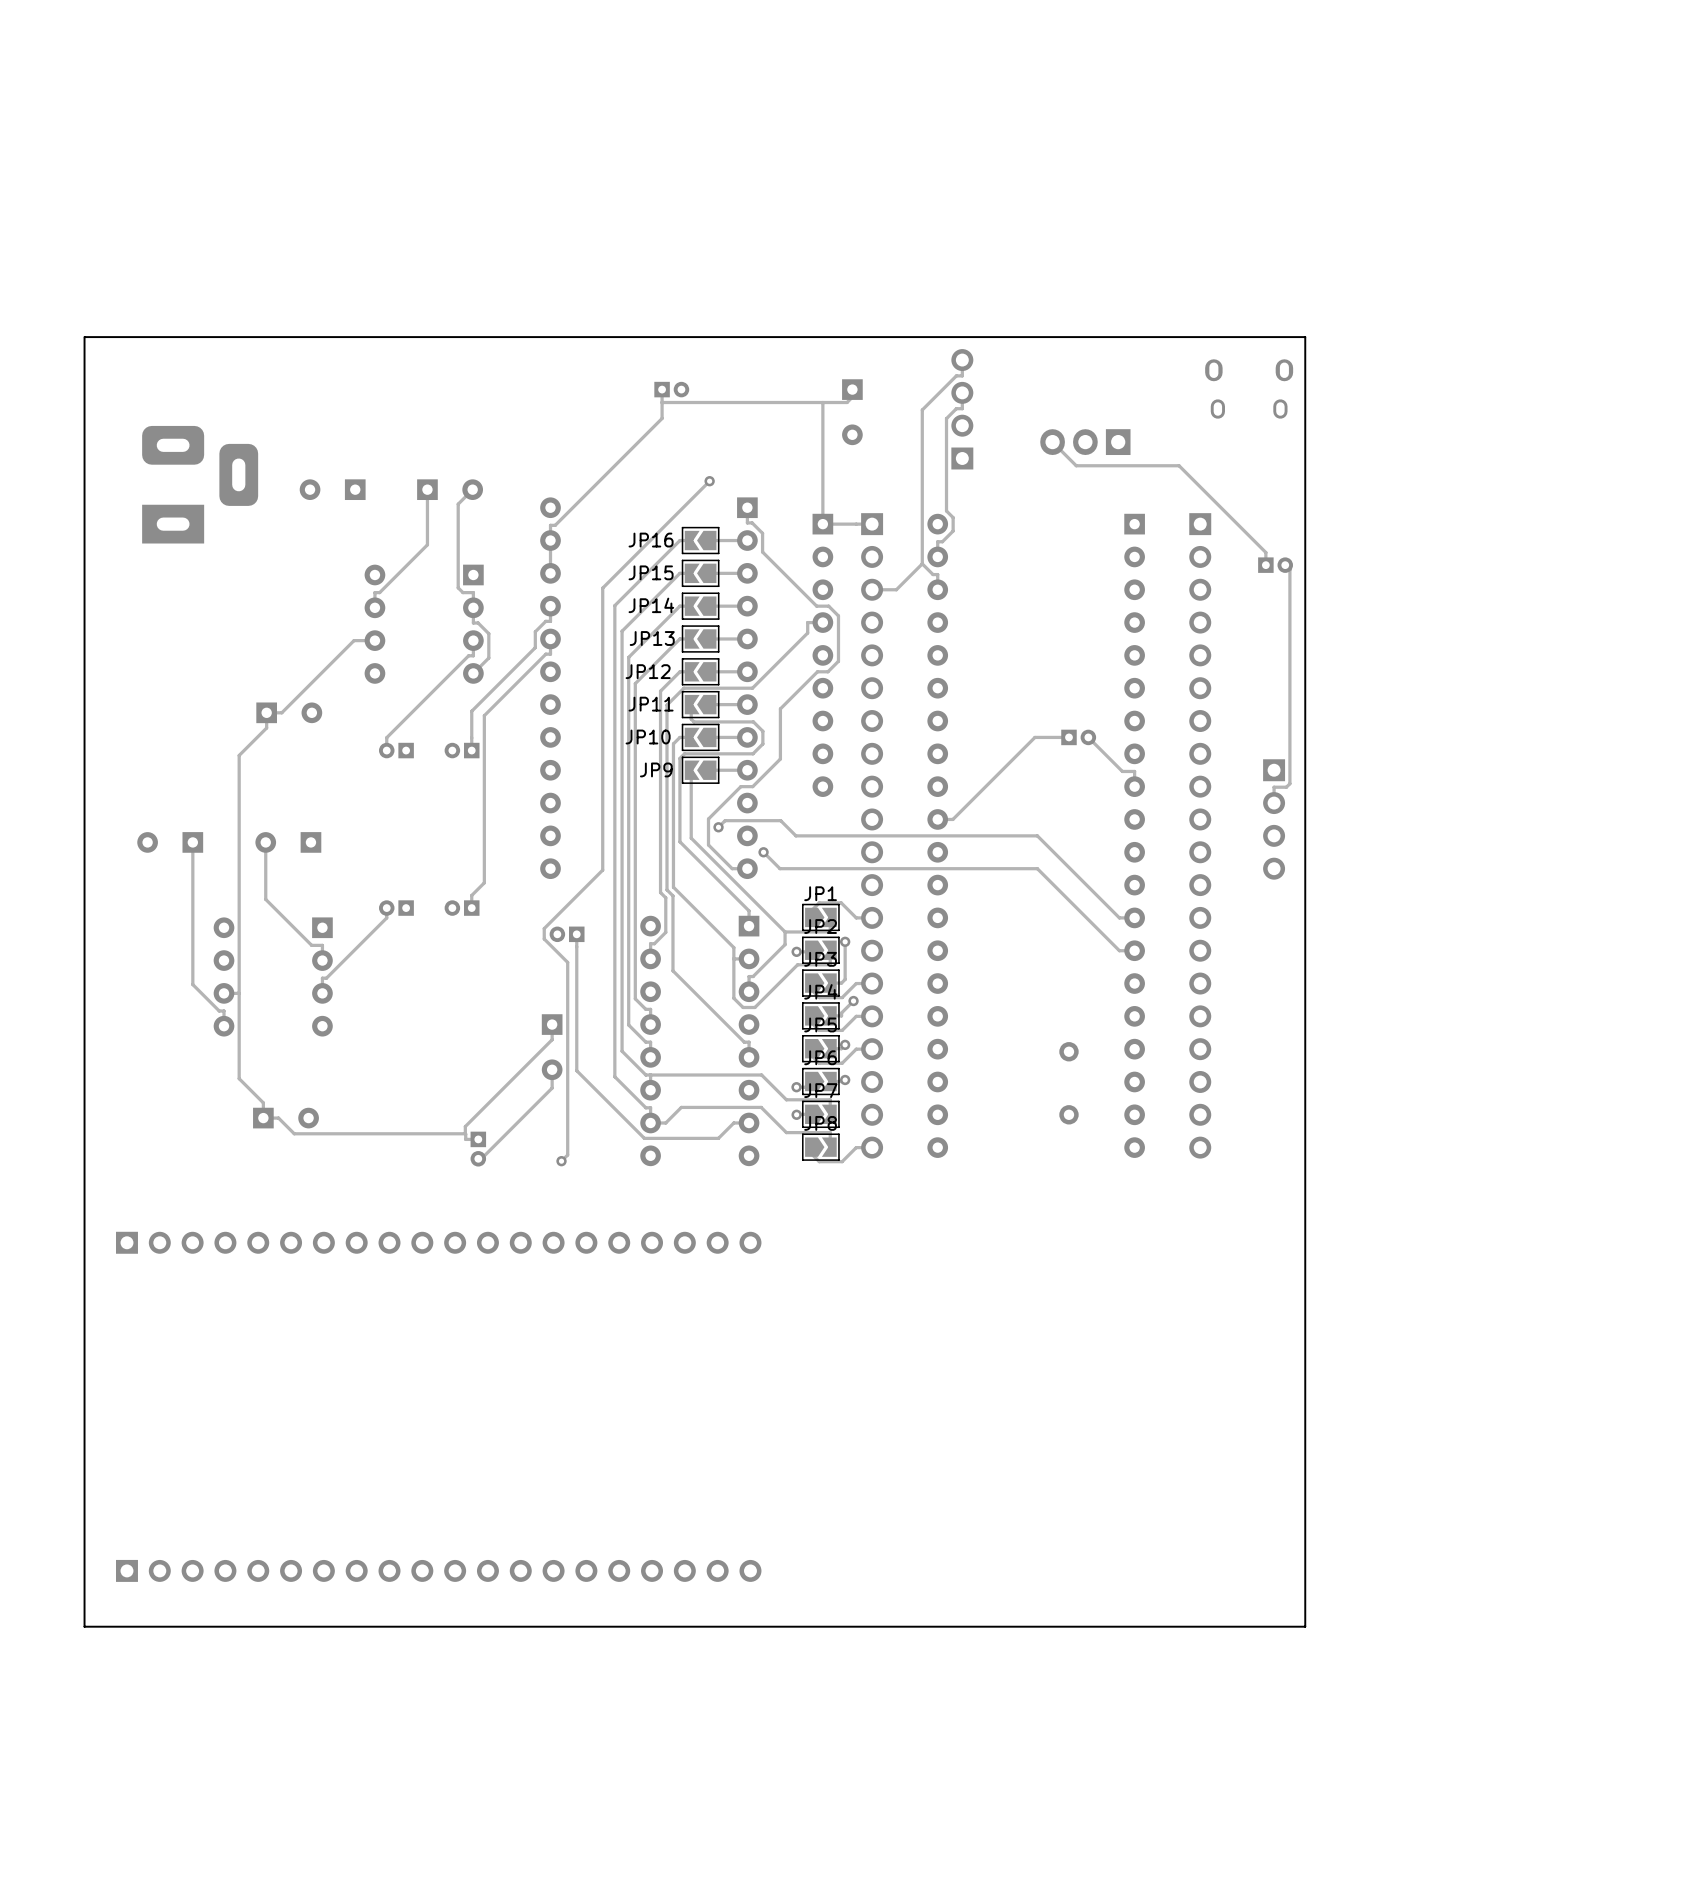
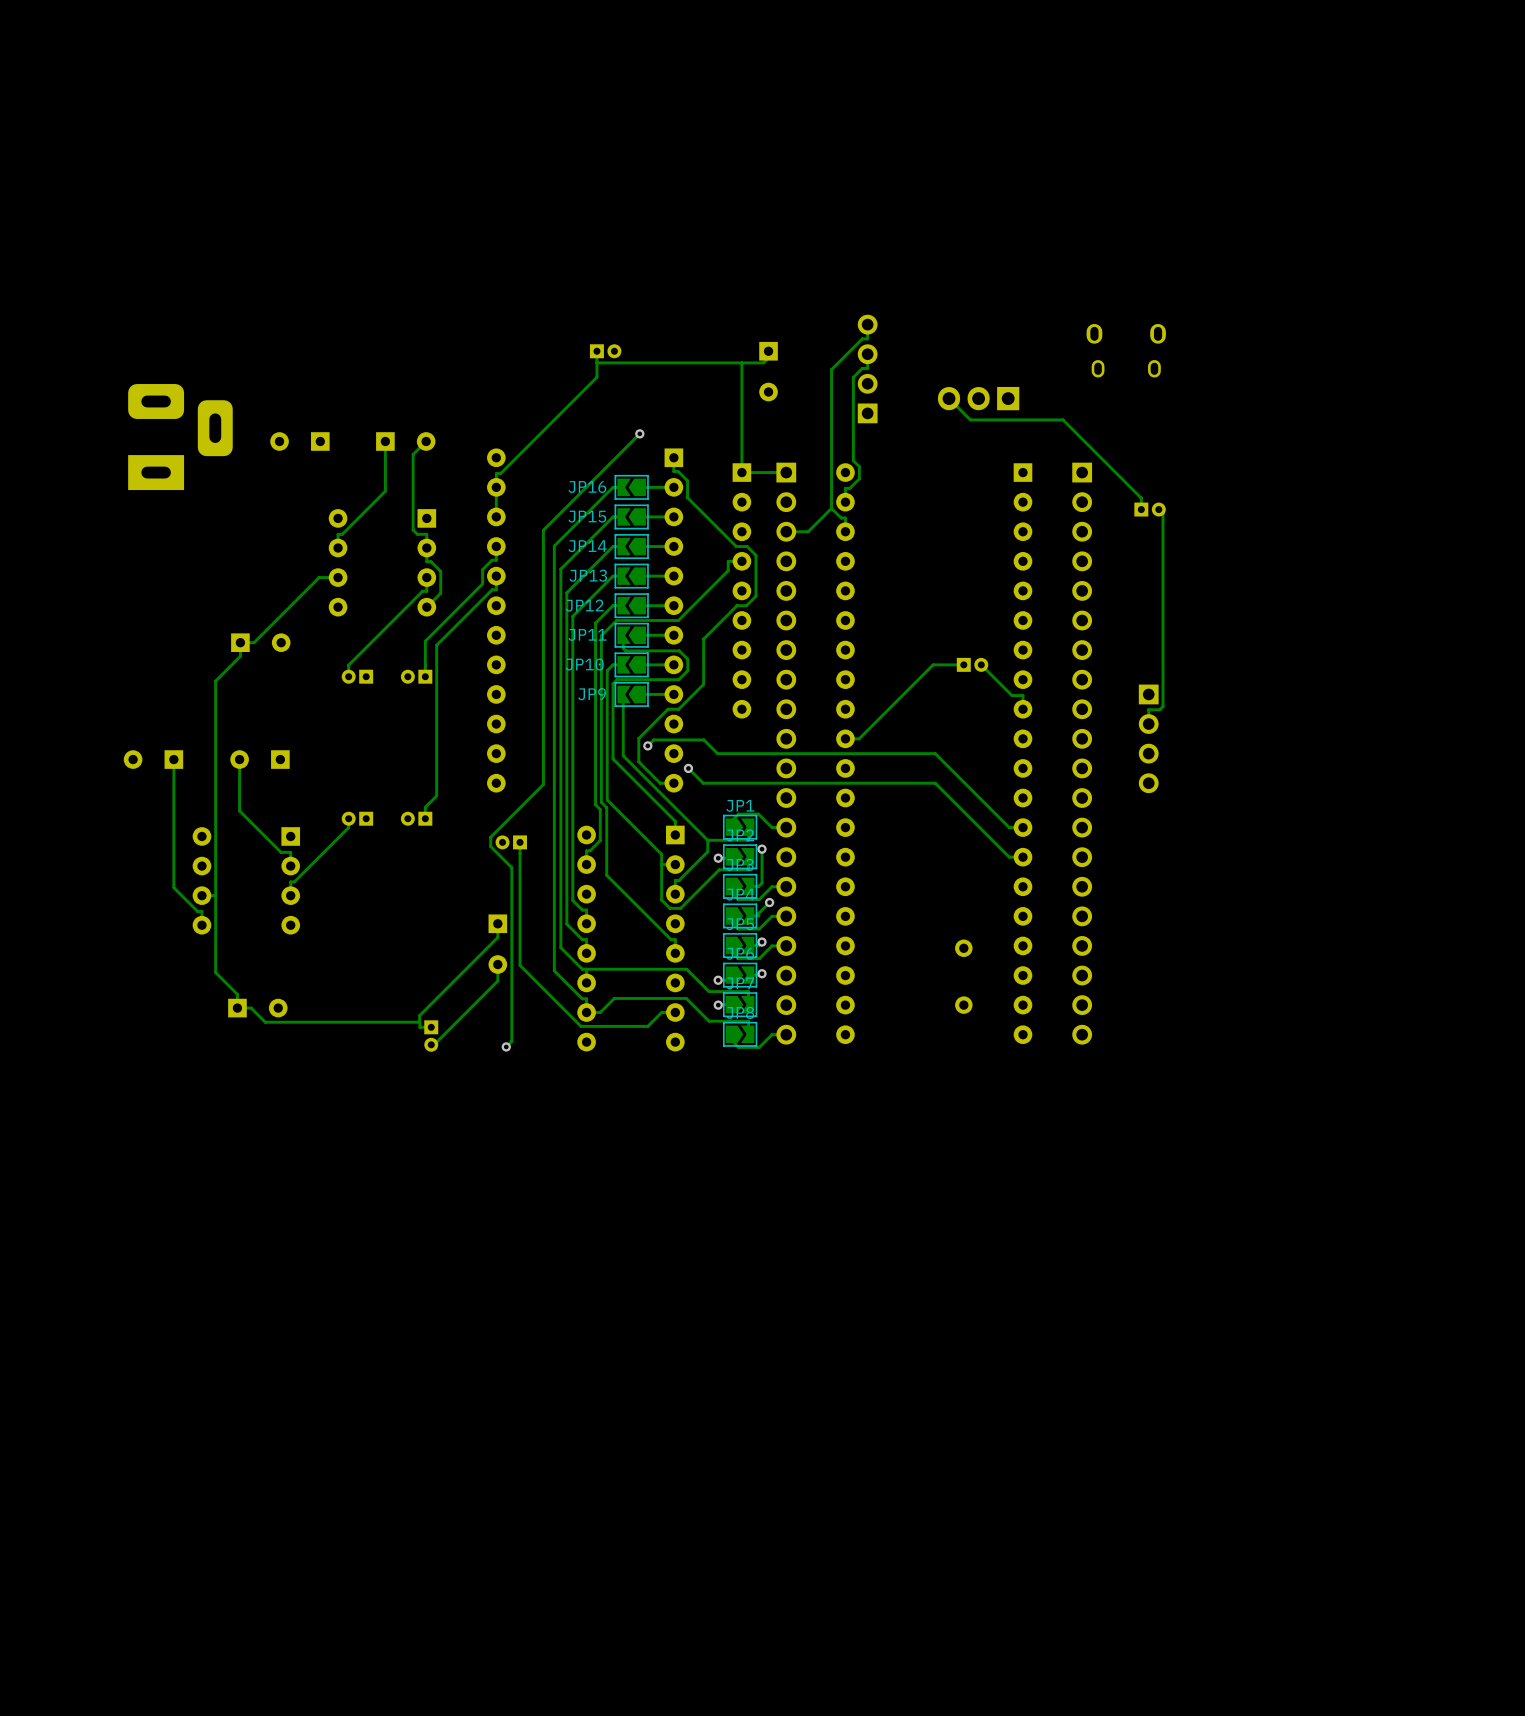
board edge: (84, 337) (1305, 337) (1305, 1626) (84, 1626) (84, 337) -> none
part: (438, 1242) -> none
part: (438, 1570) -> none

